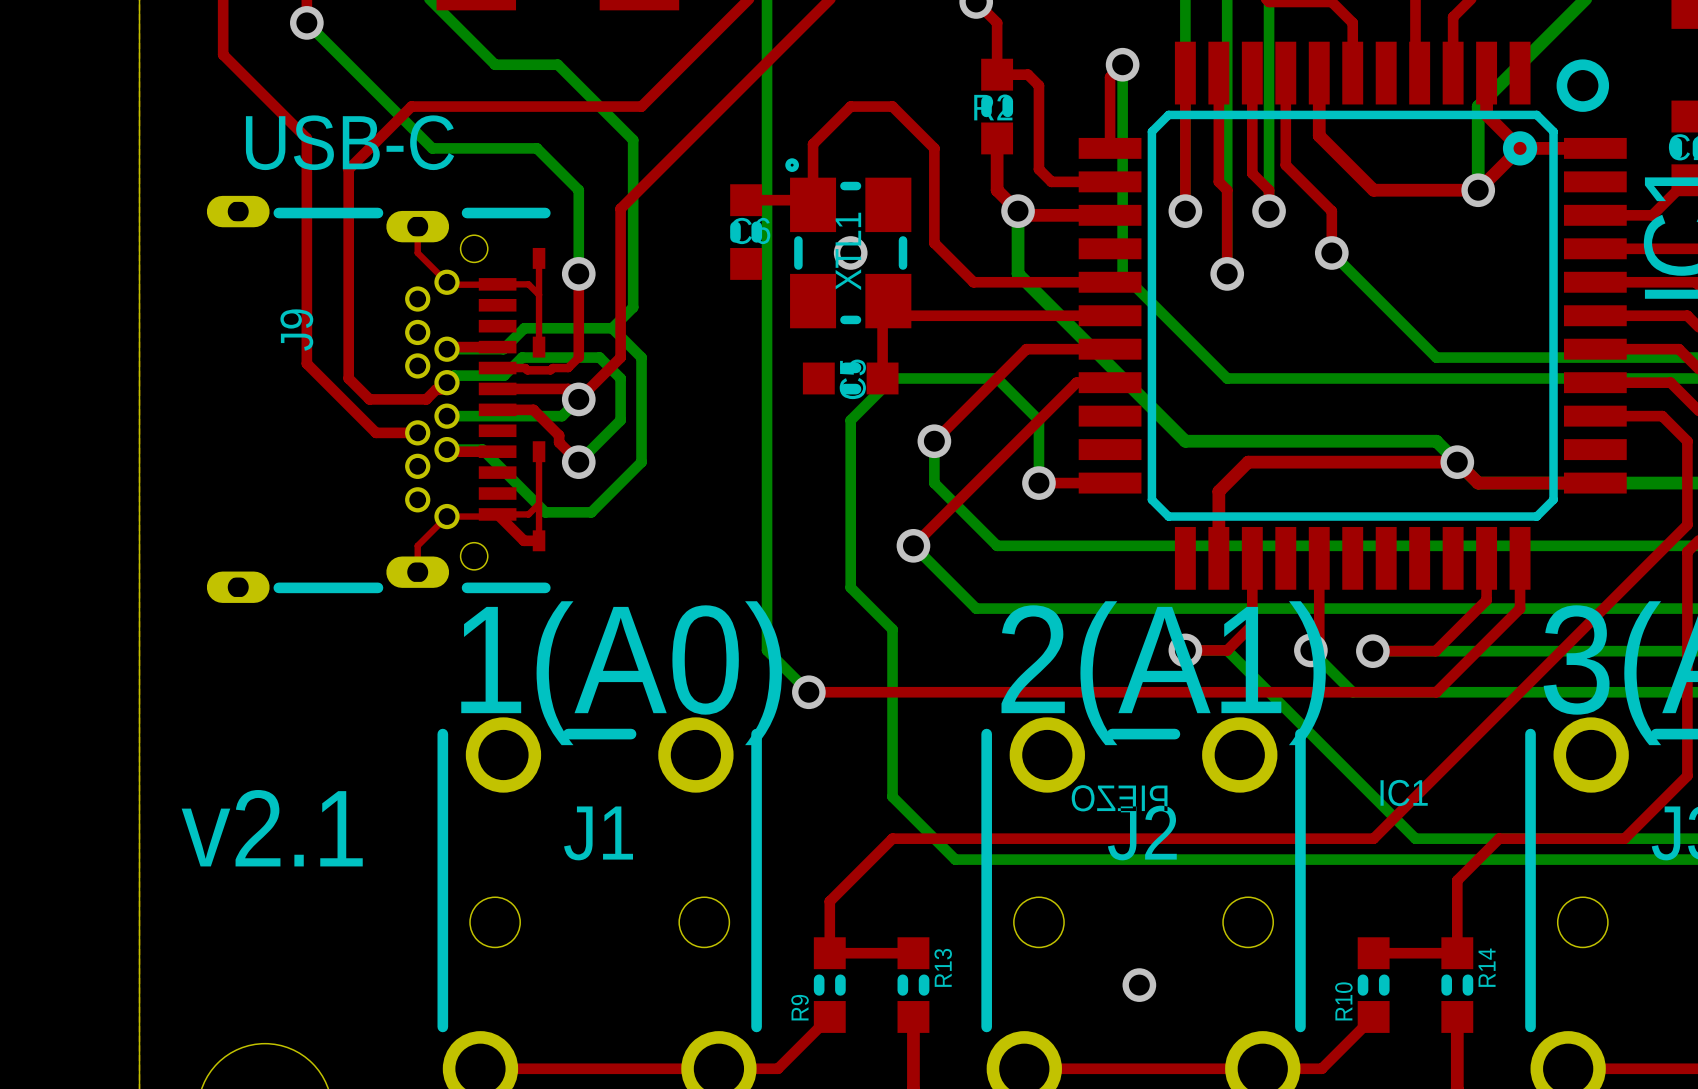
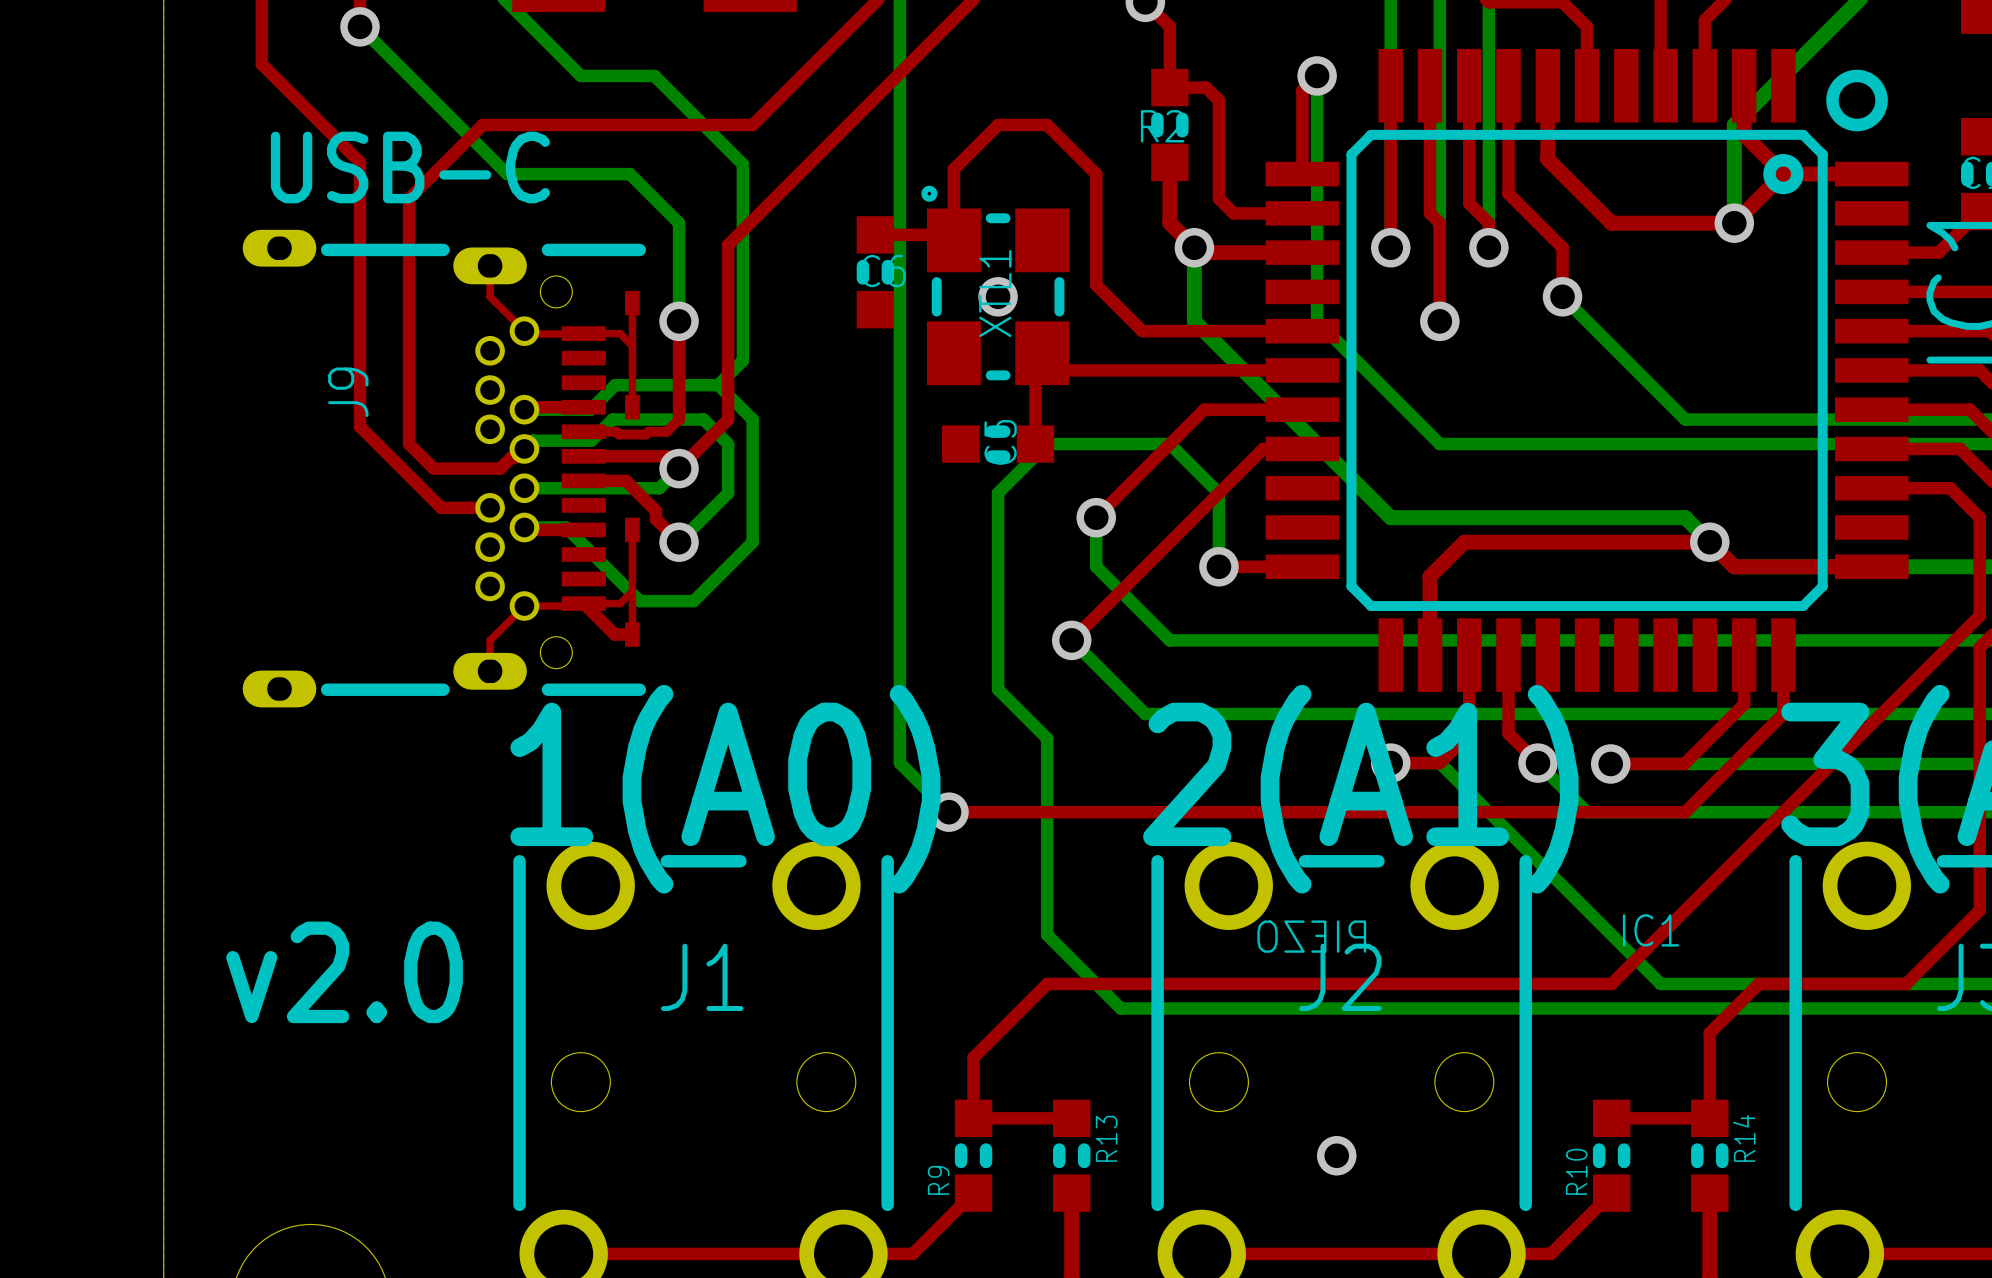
top track: (1319, 558) (1319, 642) (1310, 650) -> (1508, 655) (1508, 733) (1537, 763)
text: v2.1 (272, 828) -> v2.0 (344, 972)

